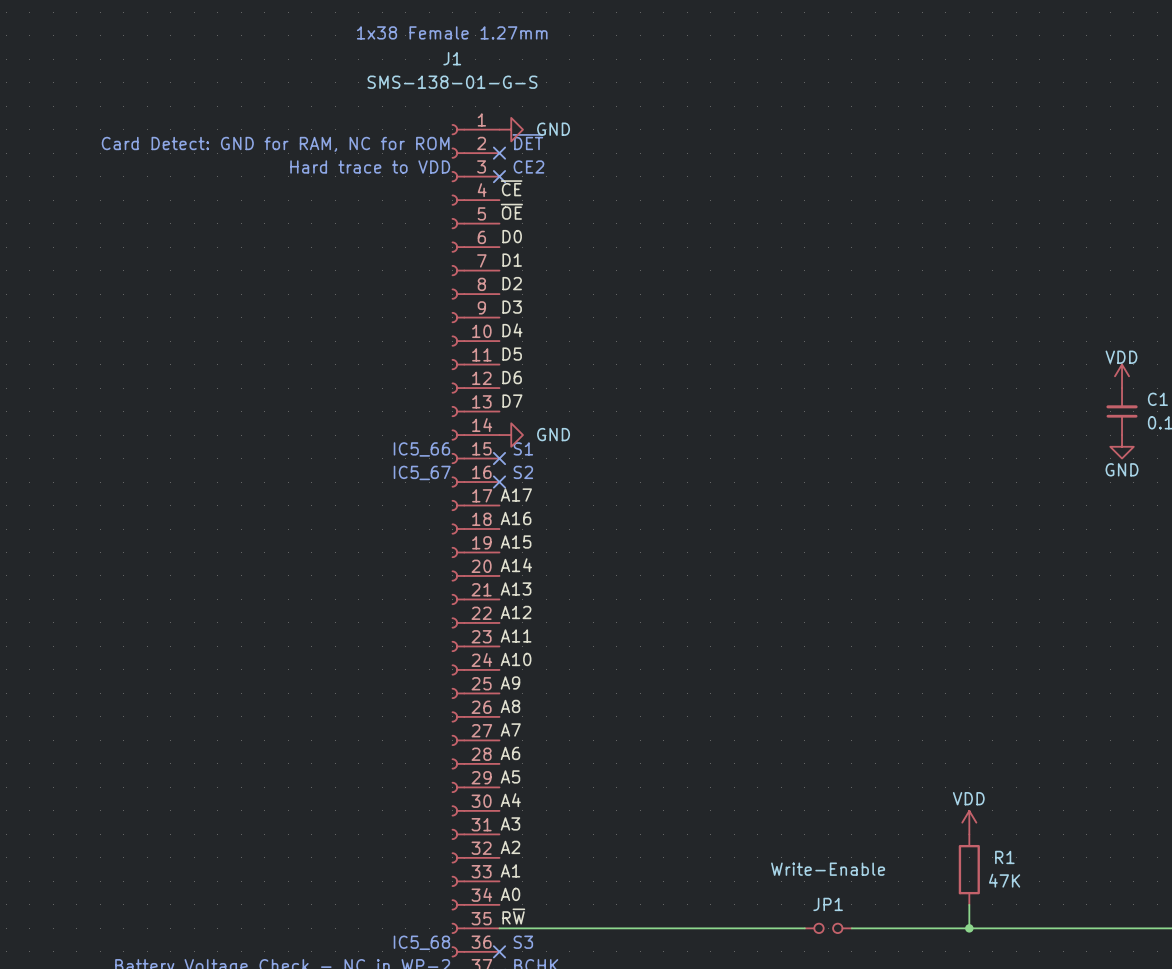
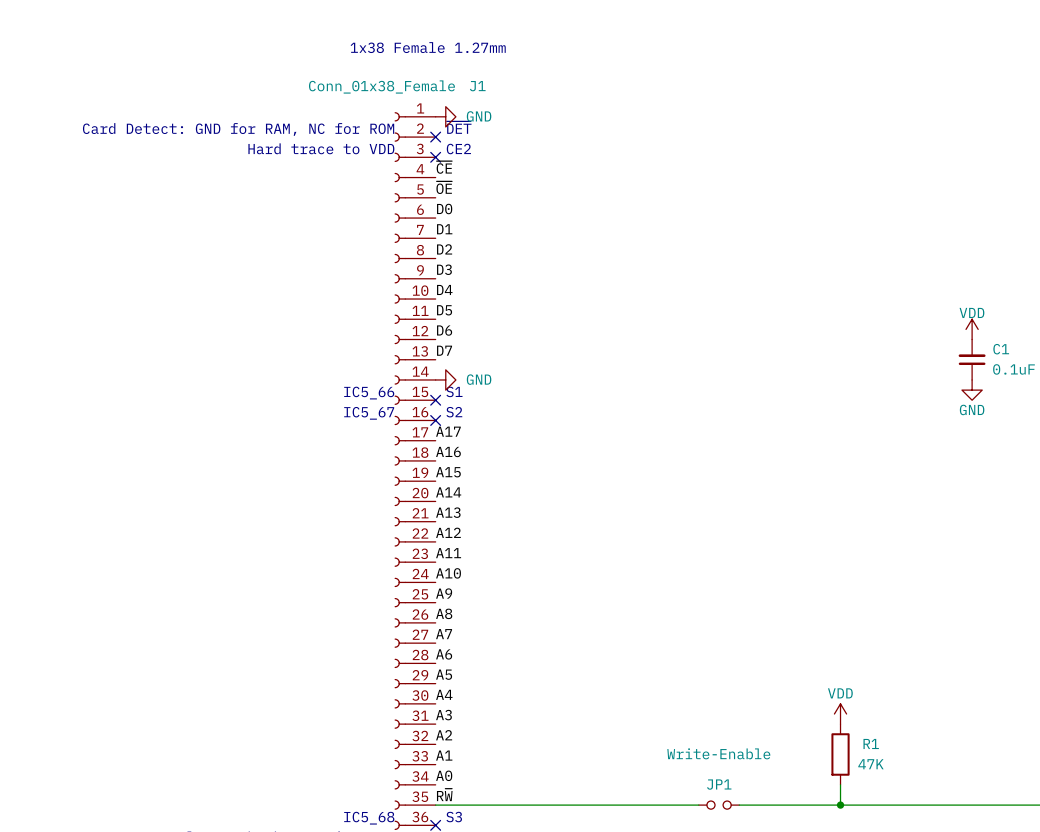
text position: 1x38 Female 1.27mm (452, 32) -> 1x38 Female 1.27mm (428, 47)
J1 name position: J1 (452, 58) -> J1 (477, 86)
J1 value: SMS-138-01-G-S (452, 82) -> Conn_01x38_Female (381, 87)

